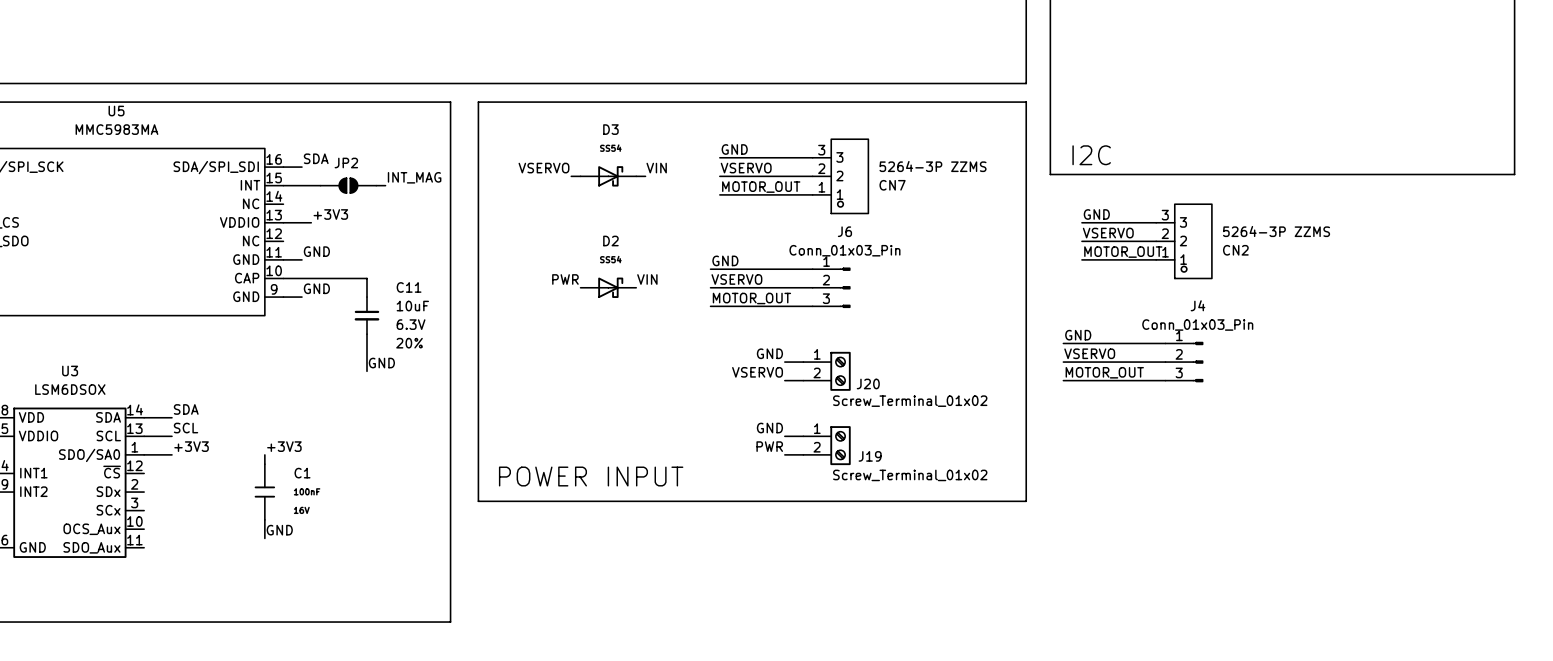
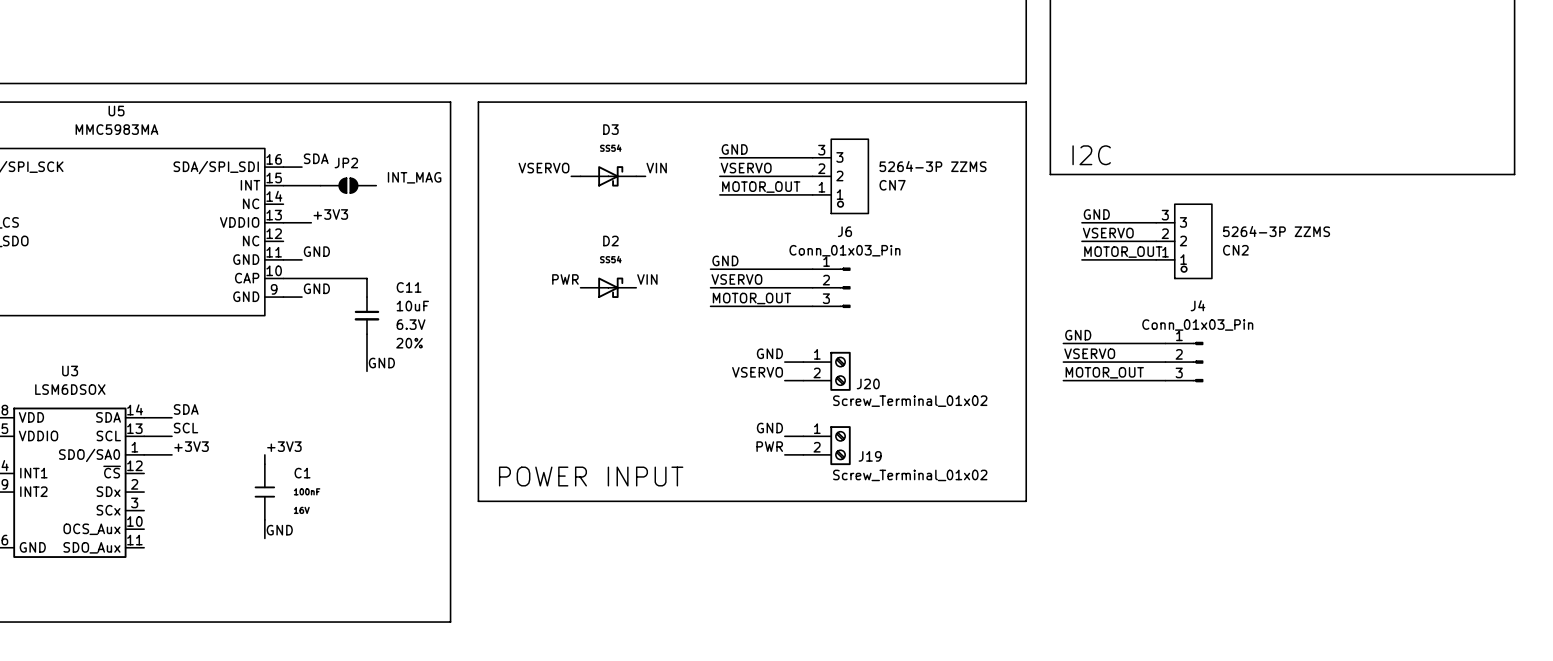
wire: (376, 185) (385, 185) -> none

